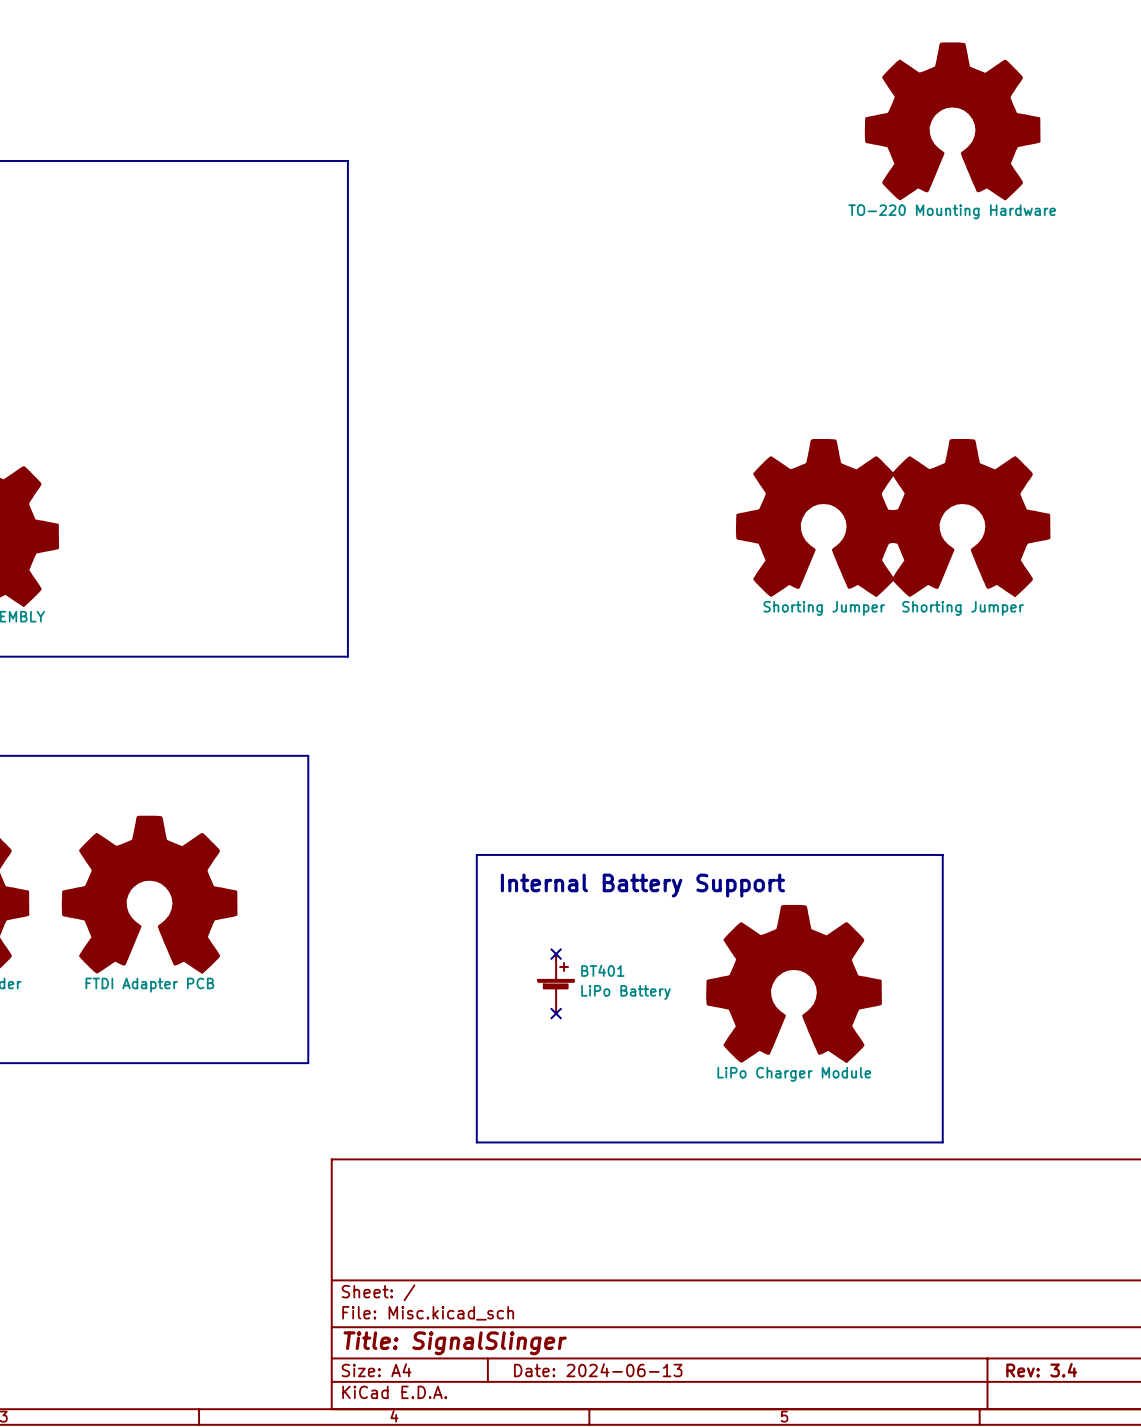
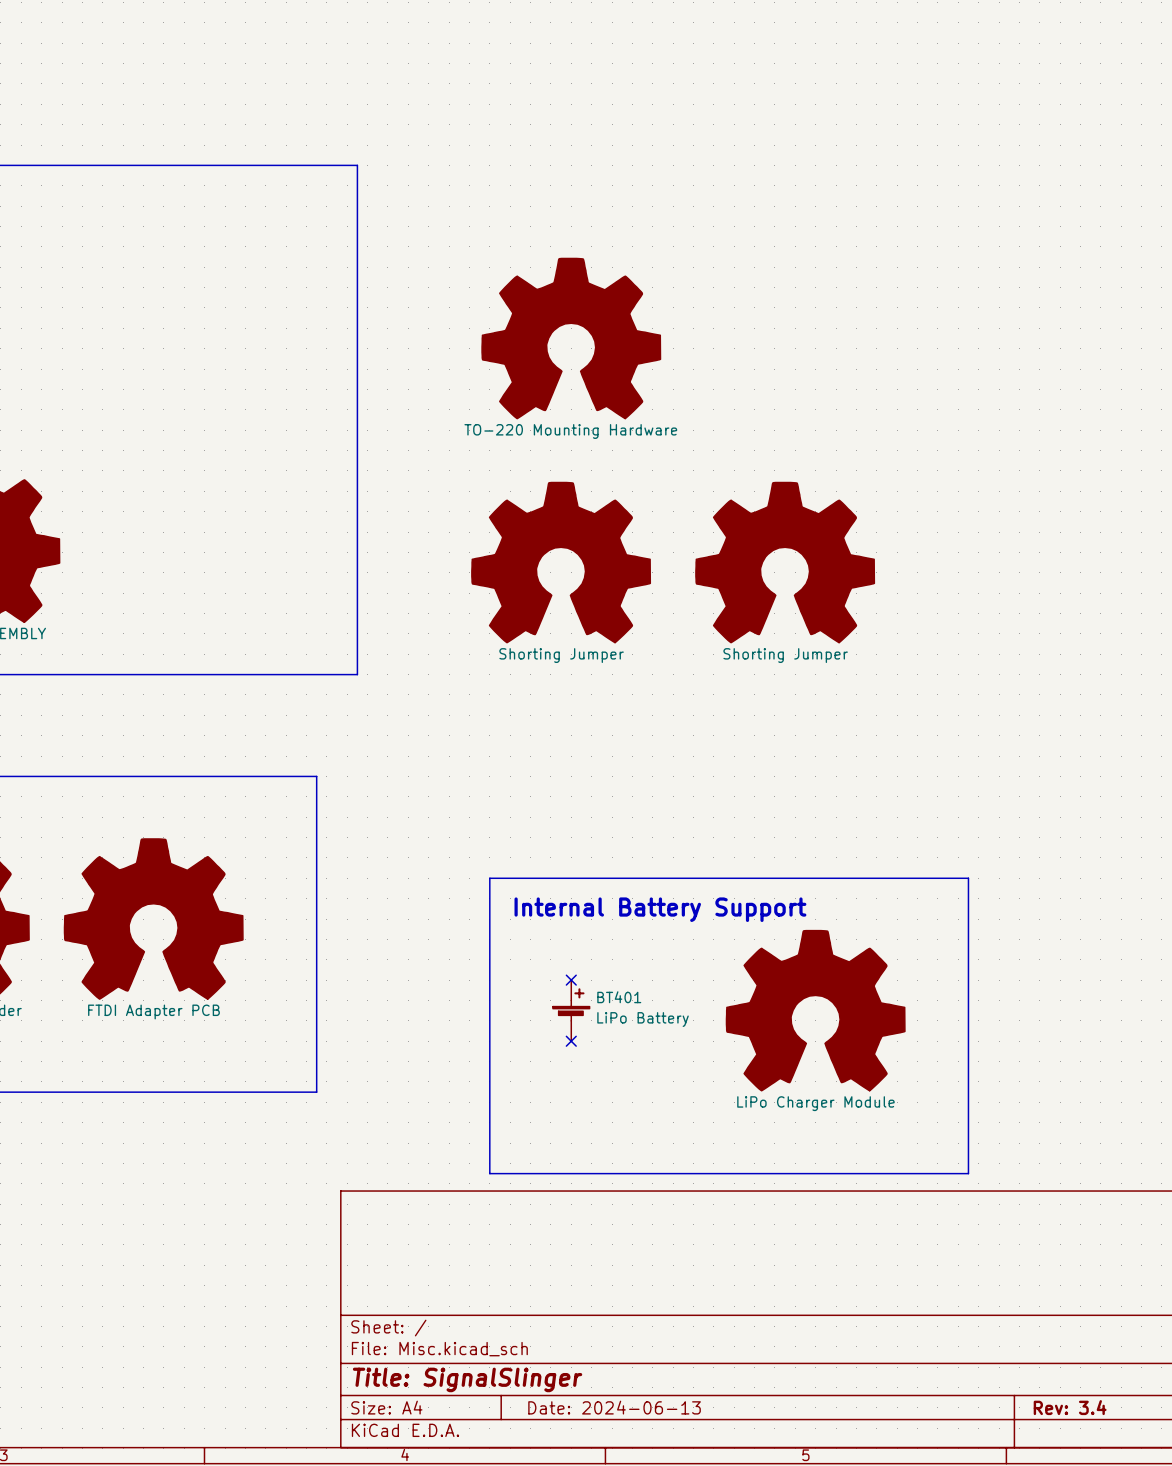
part: TO-220 Mounting Hardware (952, 121) -> none
part: none -> TO-220 Mounting Hardware (571, 338)
part position: (823, 517) -> (785, 562)
part: Shorting Jumper (962, 517) -> none
part: none -> Shorting Jumper (561, 562)

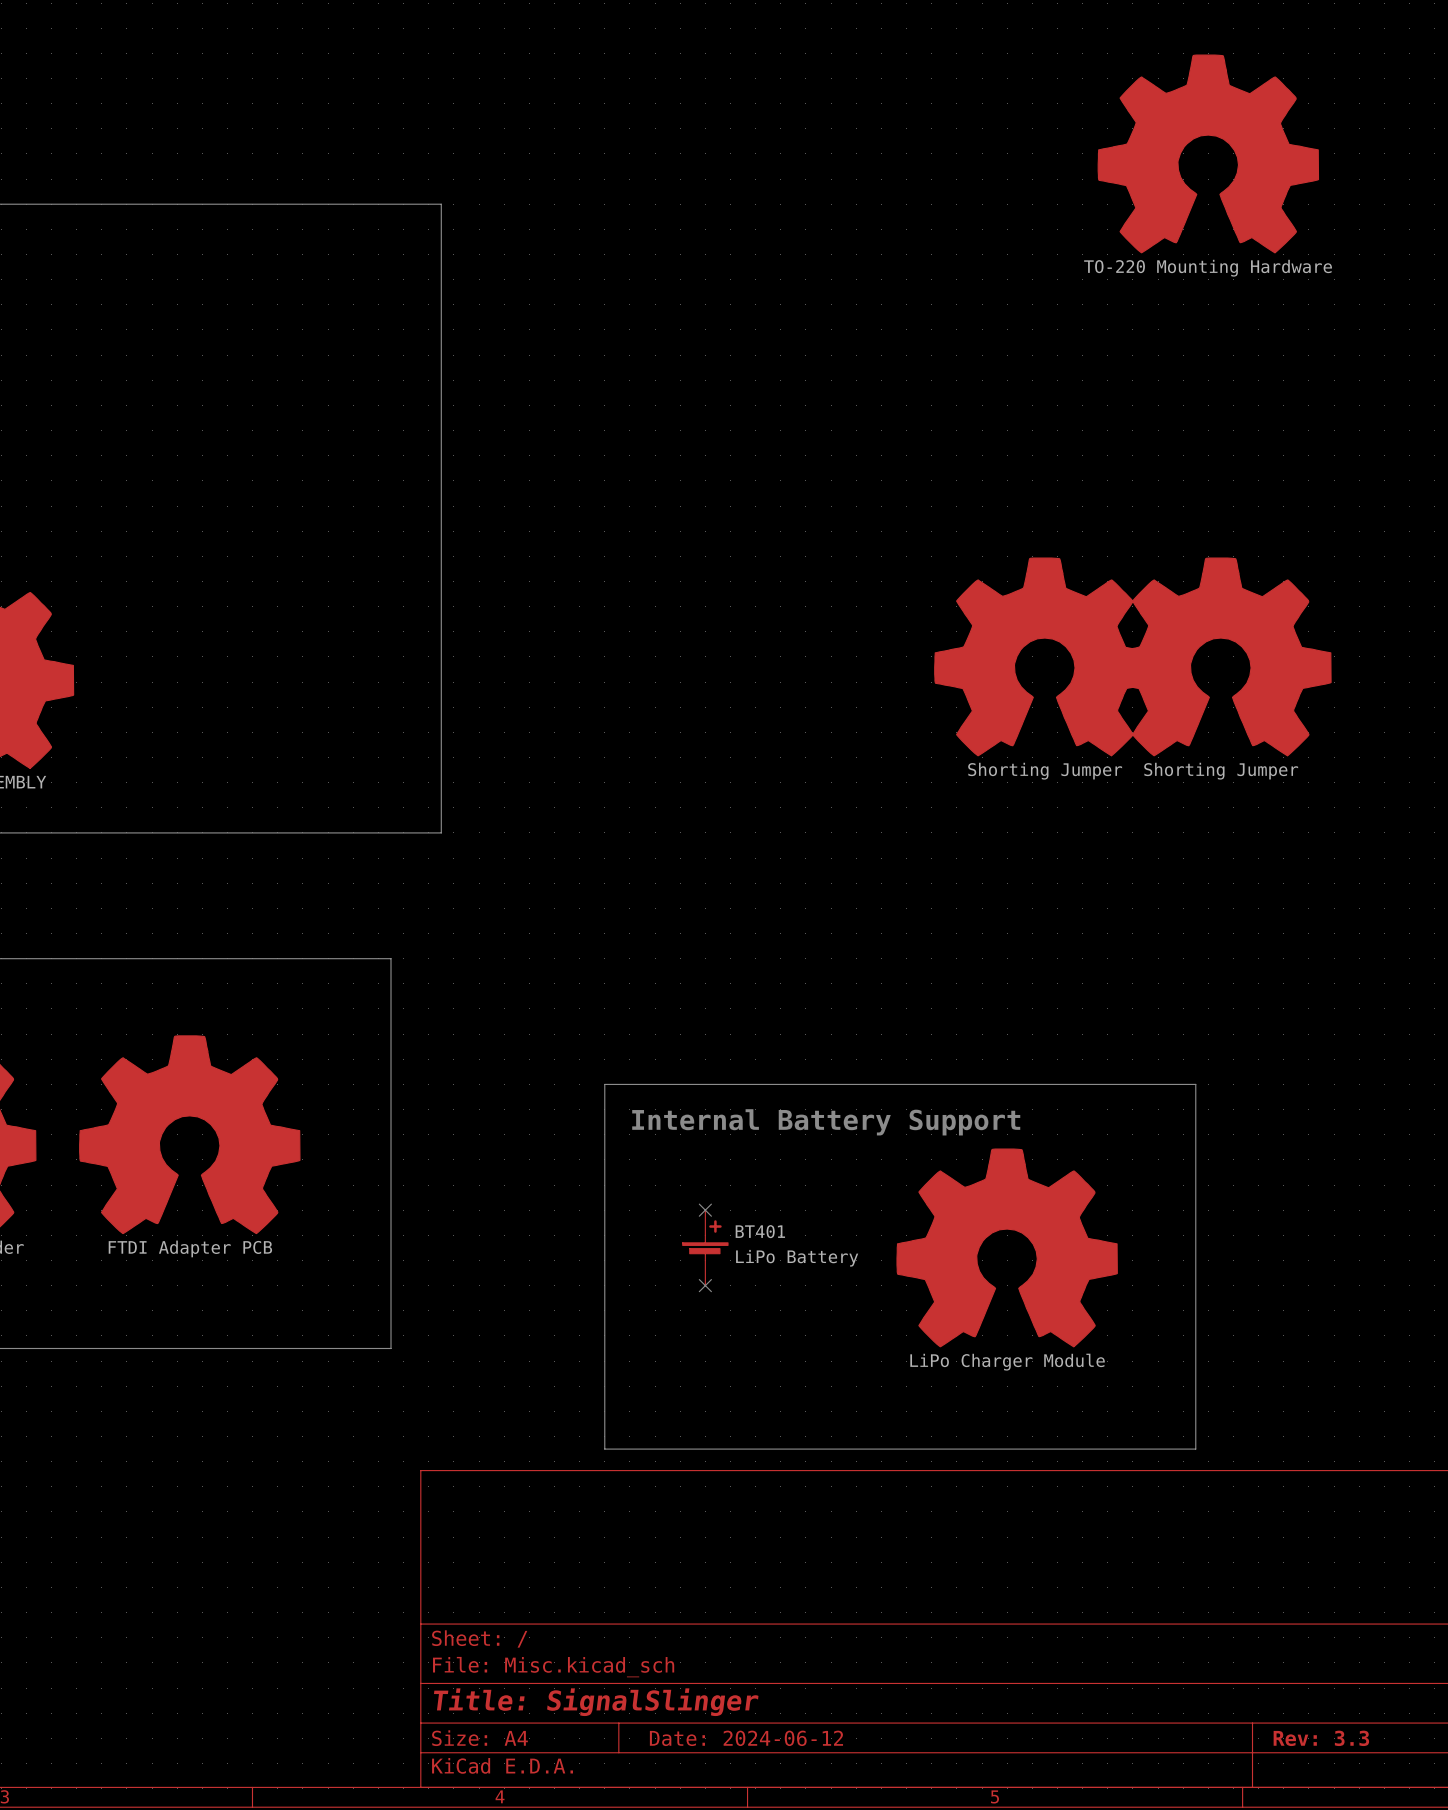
part: none -> TO-220 Mounting Hardware (1208, 153)
part: TO-220 Mounting Hardware (571, 338) -> none
part: none -> Shorting Jumper (1220, 656)
part: Shorting Jumper (561, 562) -> none
part position: (785, 562) -> (1044, 656)
title block: Date: 2024-06-13 (614, 1407) -> Date: 2024-06-12 (746, 1738)
title block: Rev: 3.4 (1070, 1407) -> Rev: 3.3 (1321, 1738)

